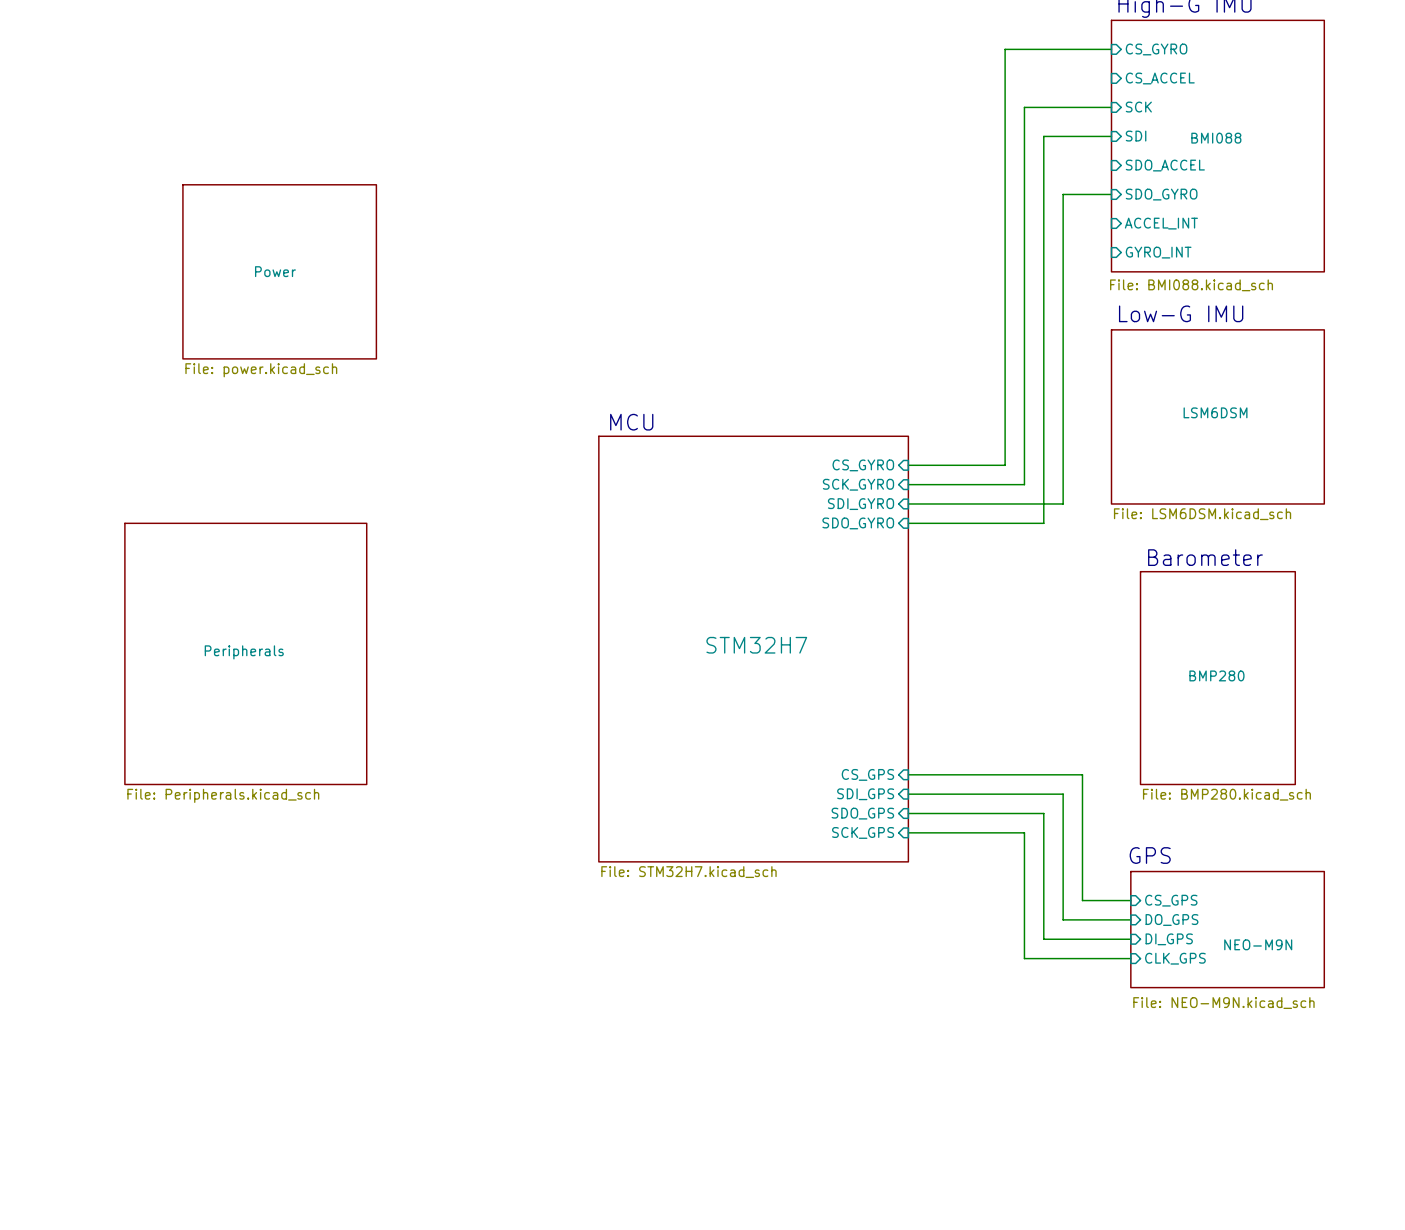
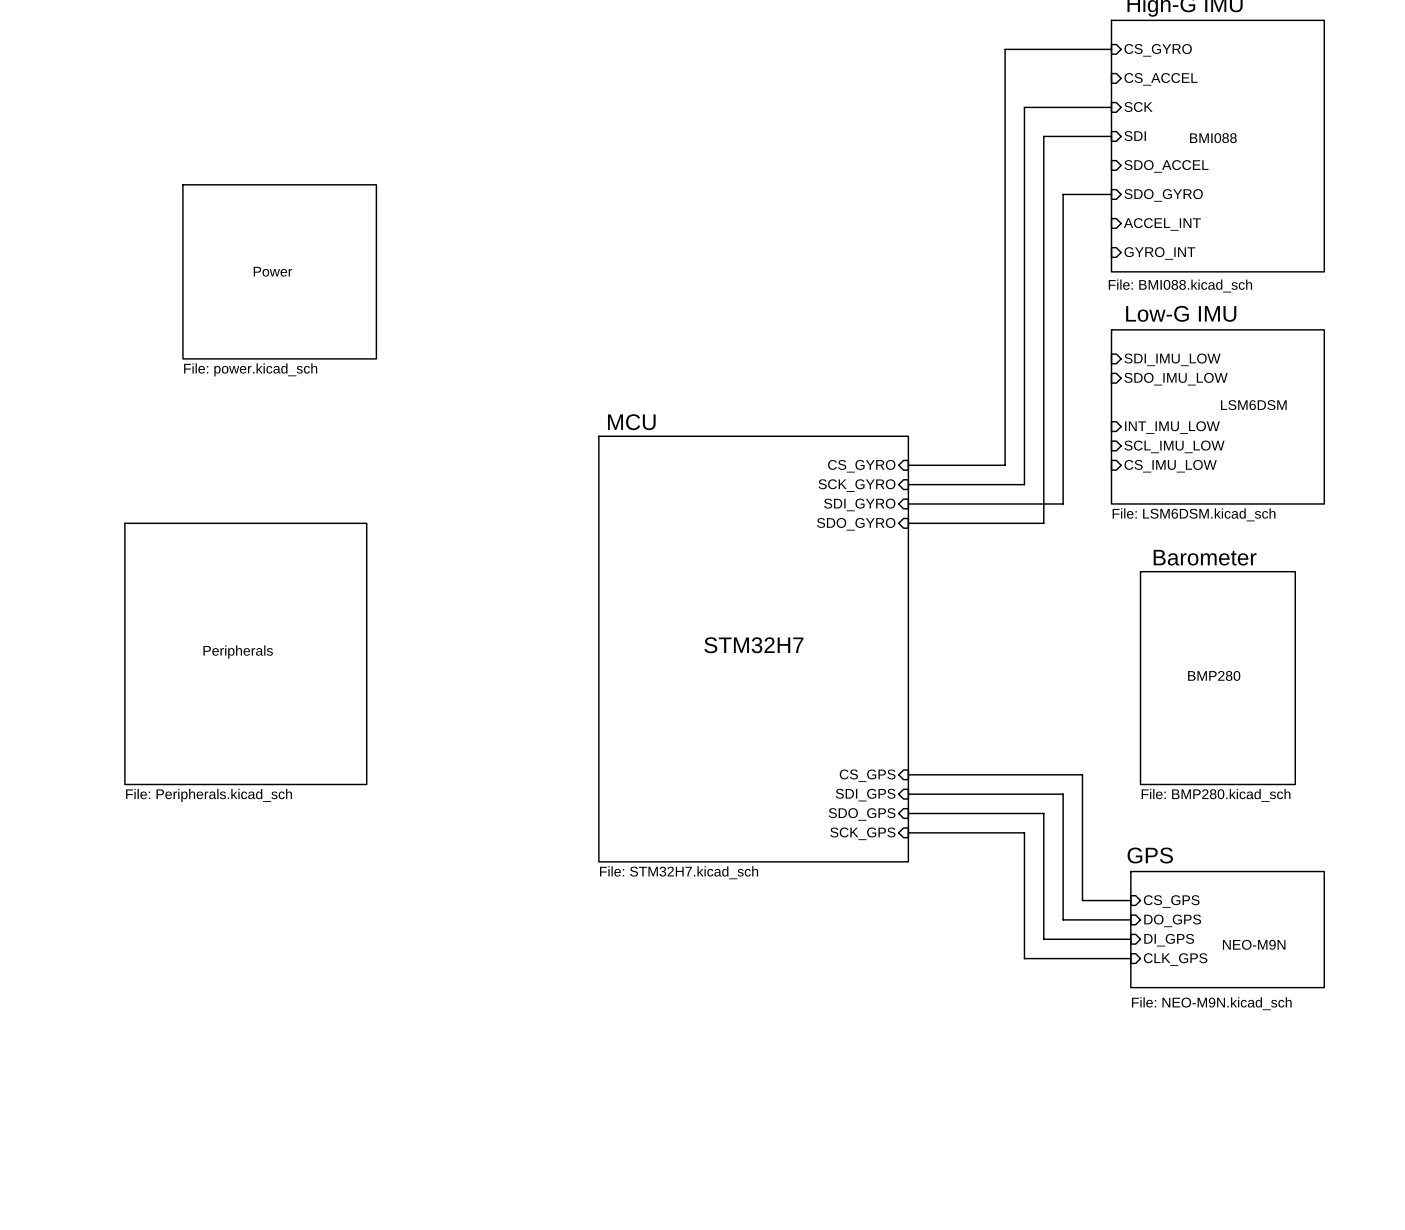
sheet pin: none -> SDI_IMU_LOW (1172, 359)
sheet pin: none -> SDO_IMU_LOW (1176, 379)
sheet LSM6DSM name position: LSM6DSM (1215, 412) -> LSM6DSM (1253, 405)
sheet pin: none -> INT_IMU_LOW (1172, 427)
sheet pin: none -> SCL_IMU_LOW (1174, 446)
sheet pin: none -> CS_IMU_LOW (1170, 466)

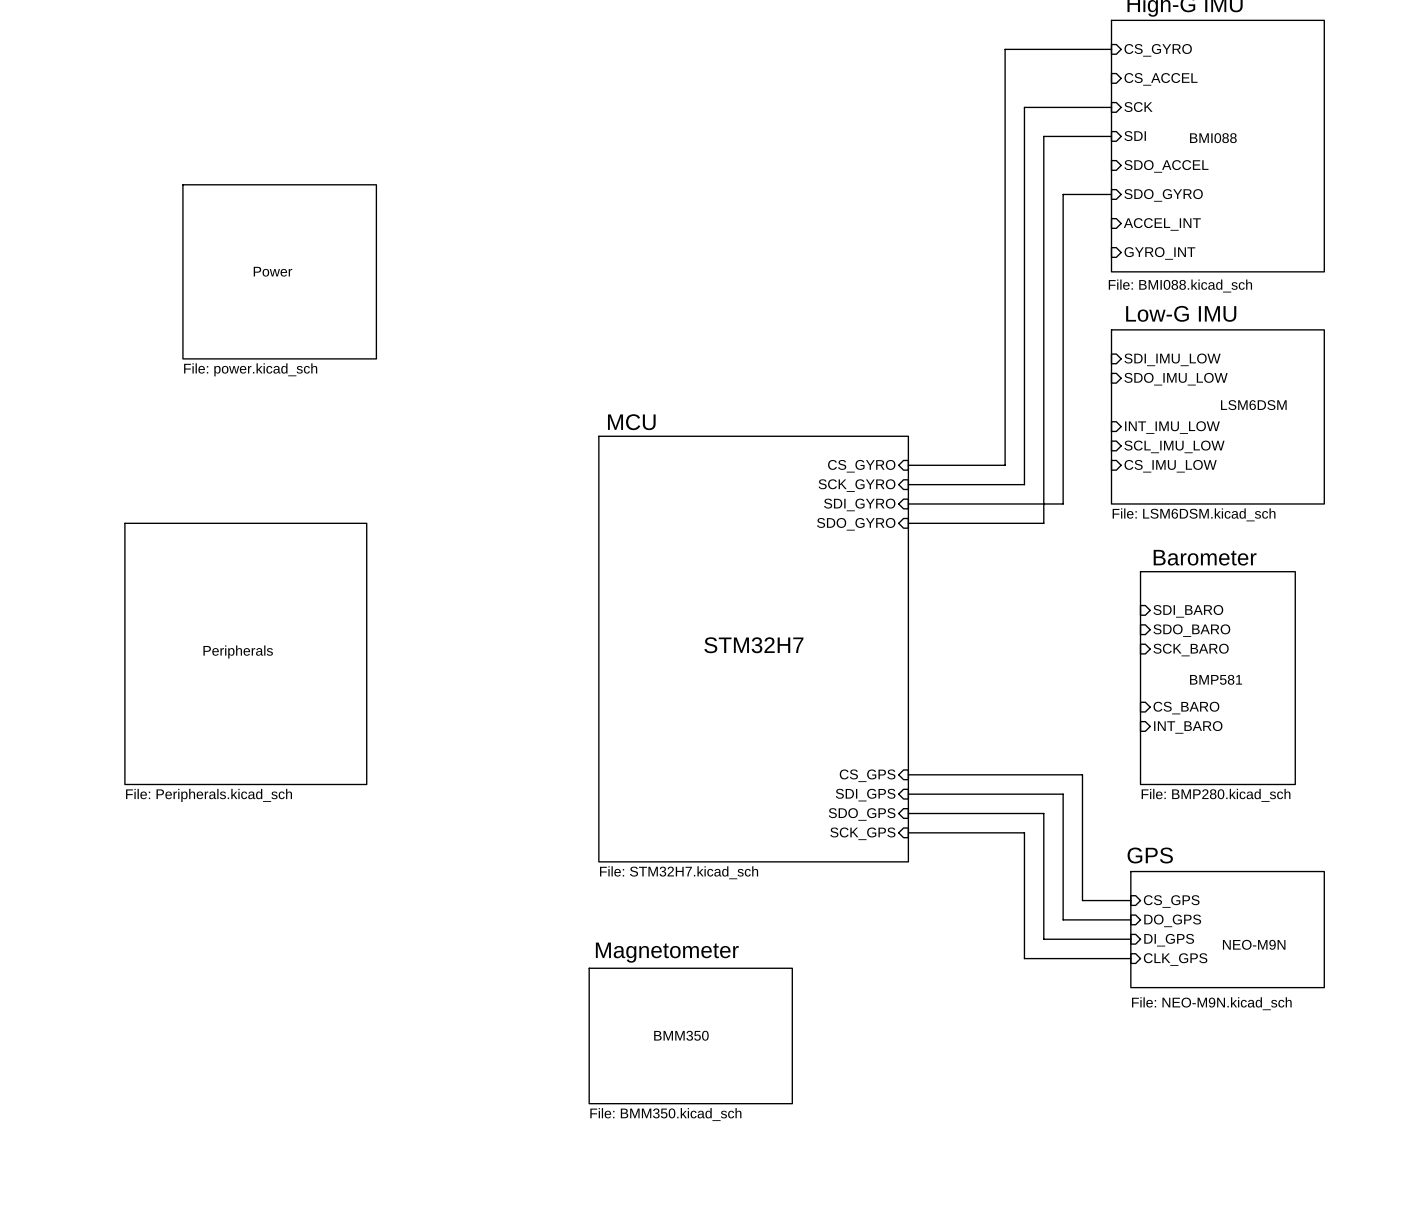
sheet pin: none -> SDI_BARO (1188, 611)
sheet pin: none -> SDO_BARO (1191, 630)
sheet pin: none -> SCK_BARO (1191, 650)
sheet BMP280 name: BMP280 (1214, 675) -> BMP581 (1216, 679)
sheet pin: none -> CS_BARO (1186, 708)
sheet pin: none -> INT_BARO (1188, 727)
text: none -> Magnetometer (667, 952)
sheet BMM350: none -> File: BMM350.kicad_sch (690, 1035)

